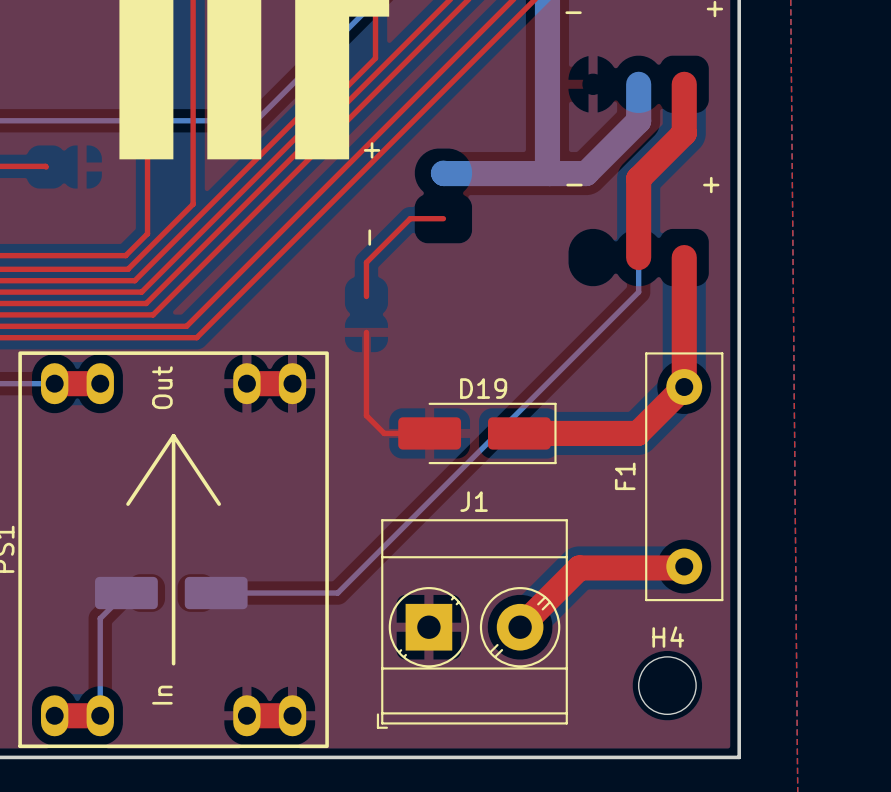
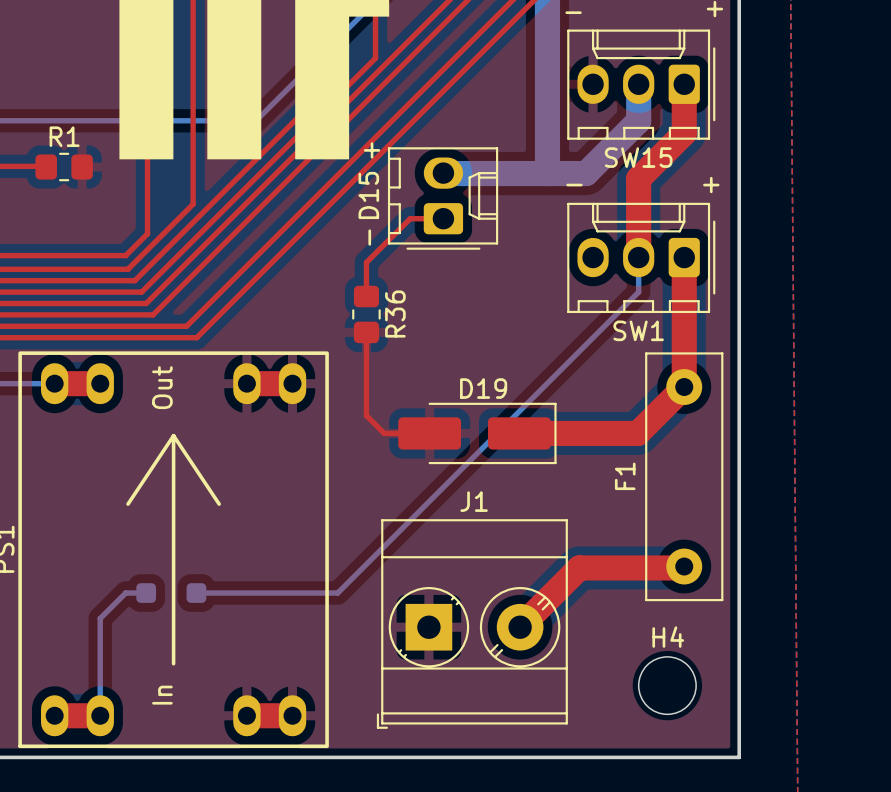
SW15: none -> (641, 84)
R1: none -> (64, 167)
D15: none -> (443, 198)
SW1: none -> (641, 257)
R36: none -> (366, 314)
part footprint: [95, 576, 248, 610] -> [136, 583, 207, 603]

